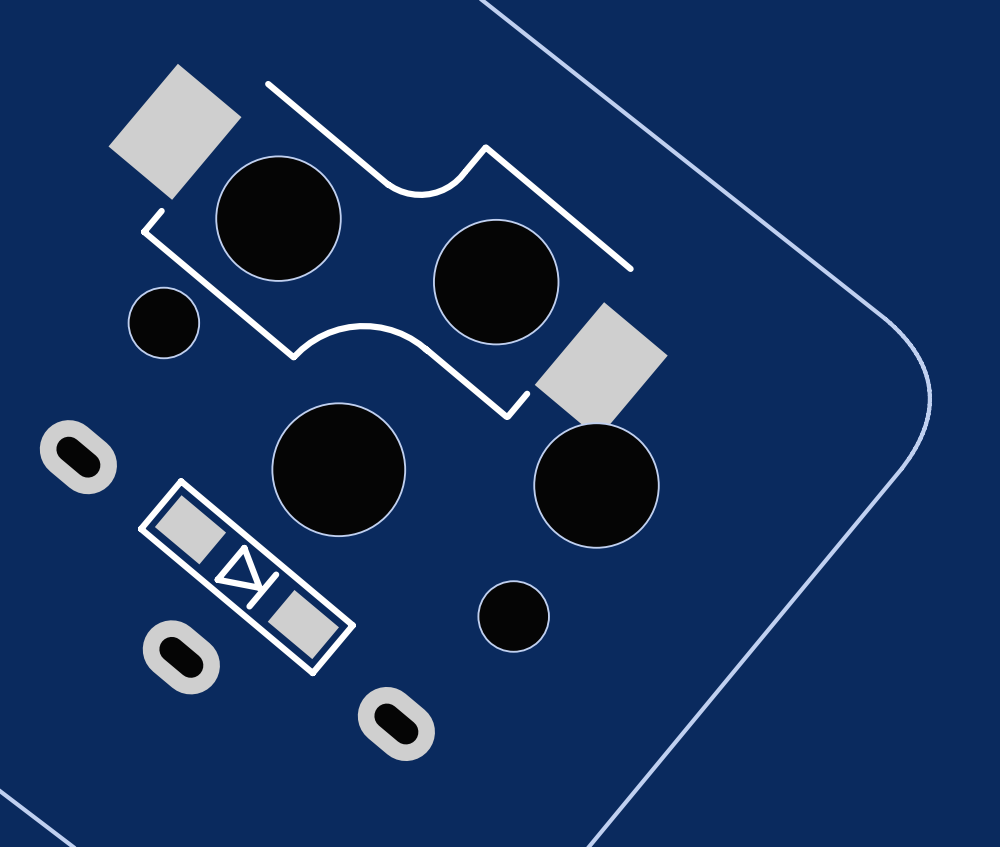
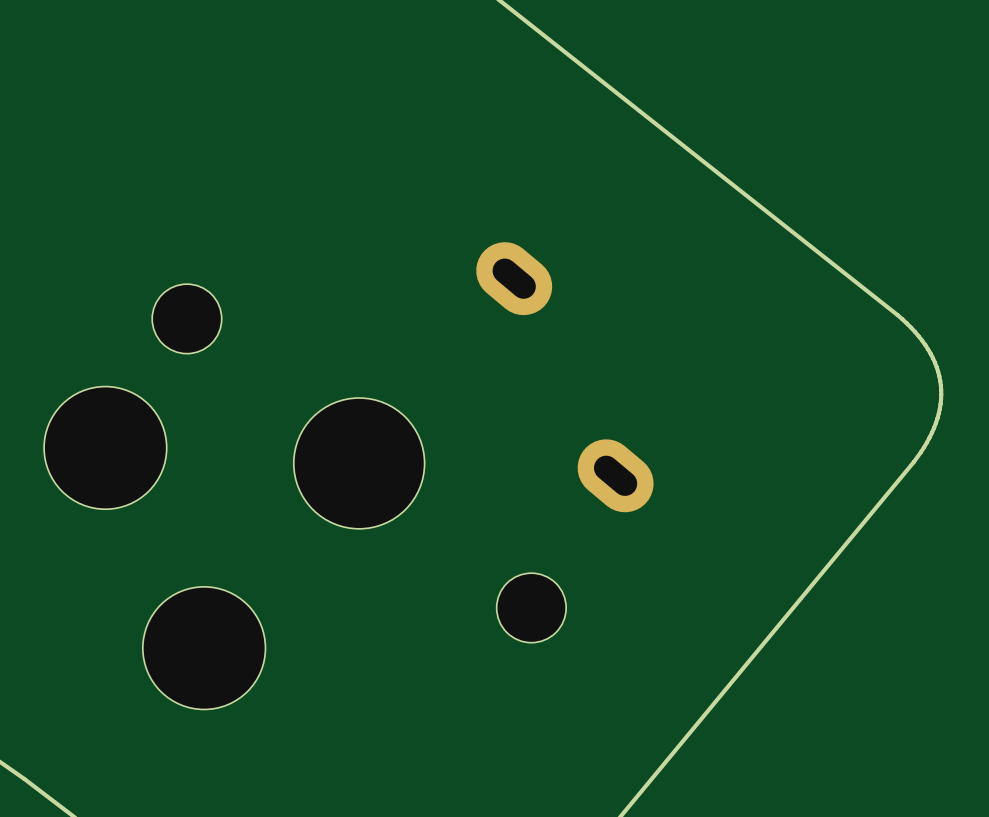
part: (353, 412) -> none
part: none -> (348, 475)
part: (246, 577) -> none

